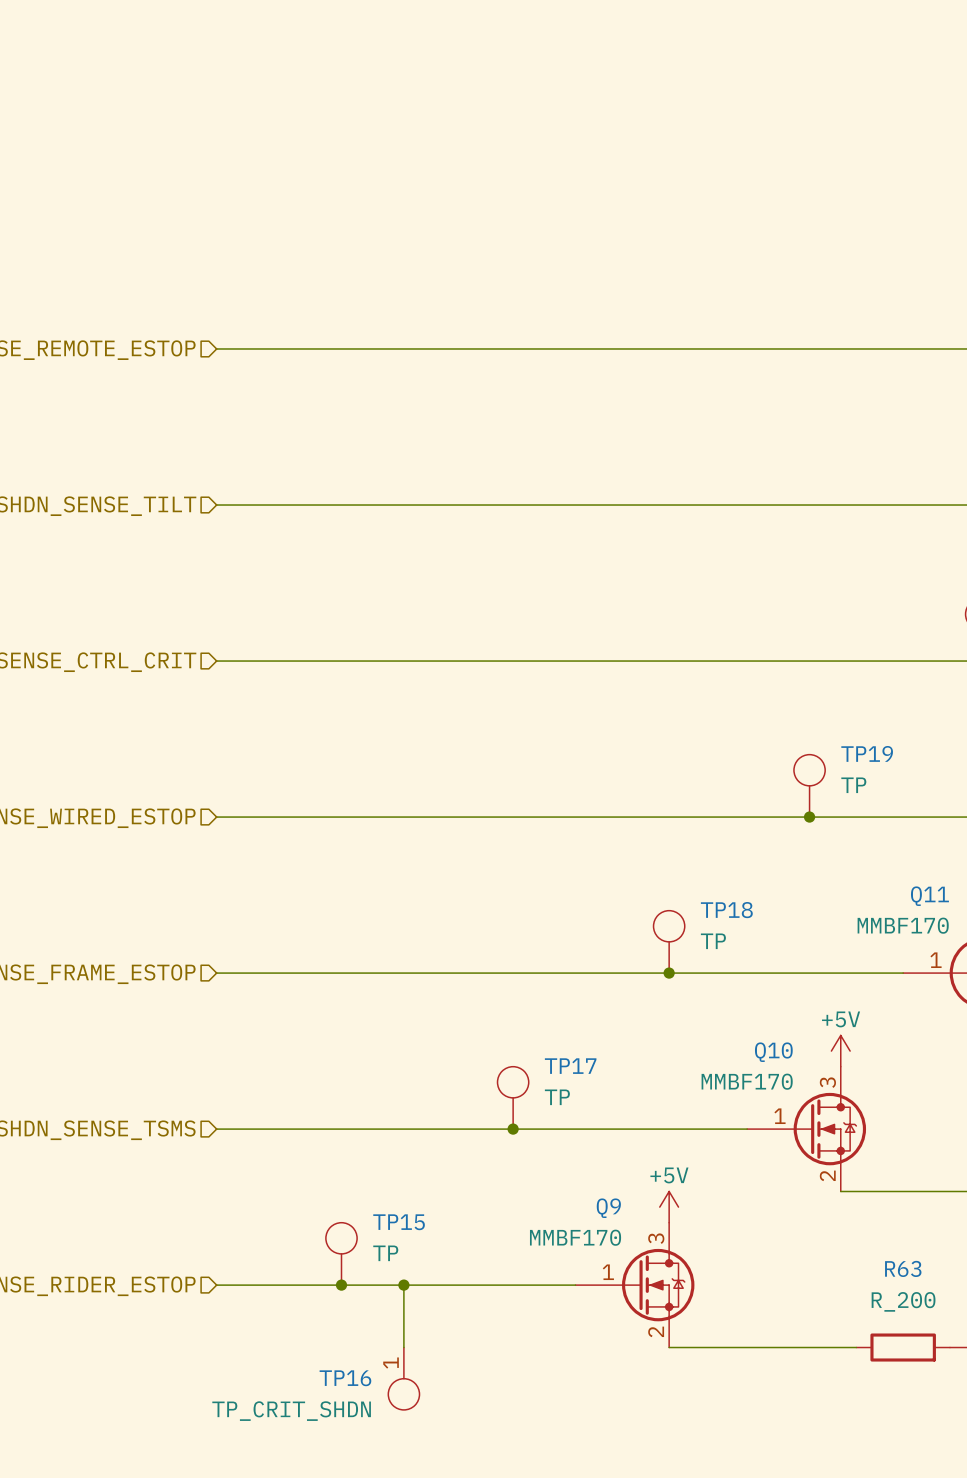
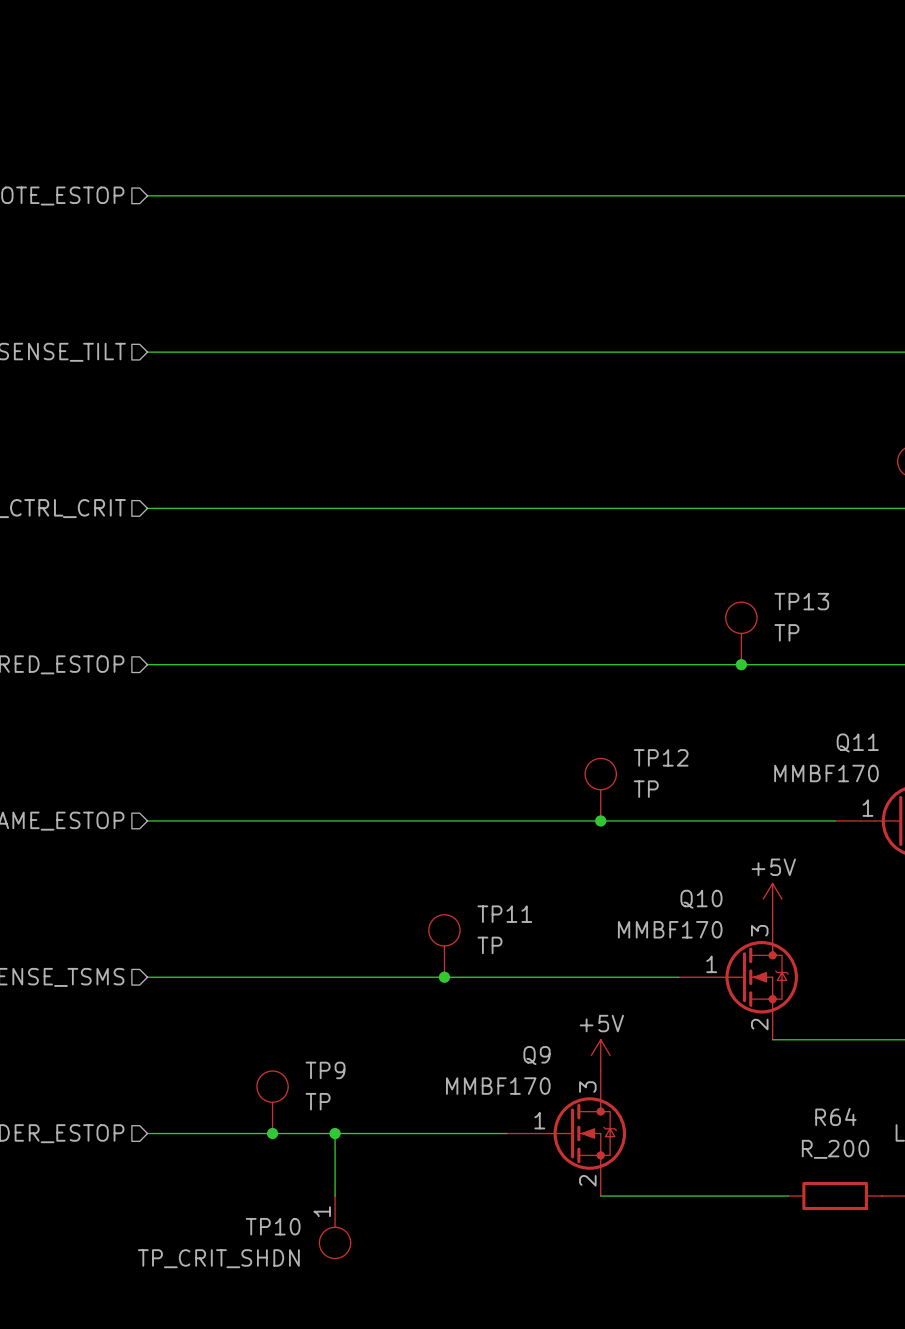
TP19 name: TP19 (867, 753) -> TP13 (801, 601)
TP18 name: TP18 (726, 910) -> TP12 (661, 757)
TP17 name: TP17 (570, 1066) -> TP11 (504, 914)
TP15 name: TP15 (399, 1222) -> TP9 (325, 1070)
R63 name: R63 (903, 1268) -> R64 (835, 1116)
TP16 name: TP16 (345, 1378) -> TP10 (273, 1226)

